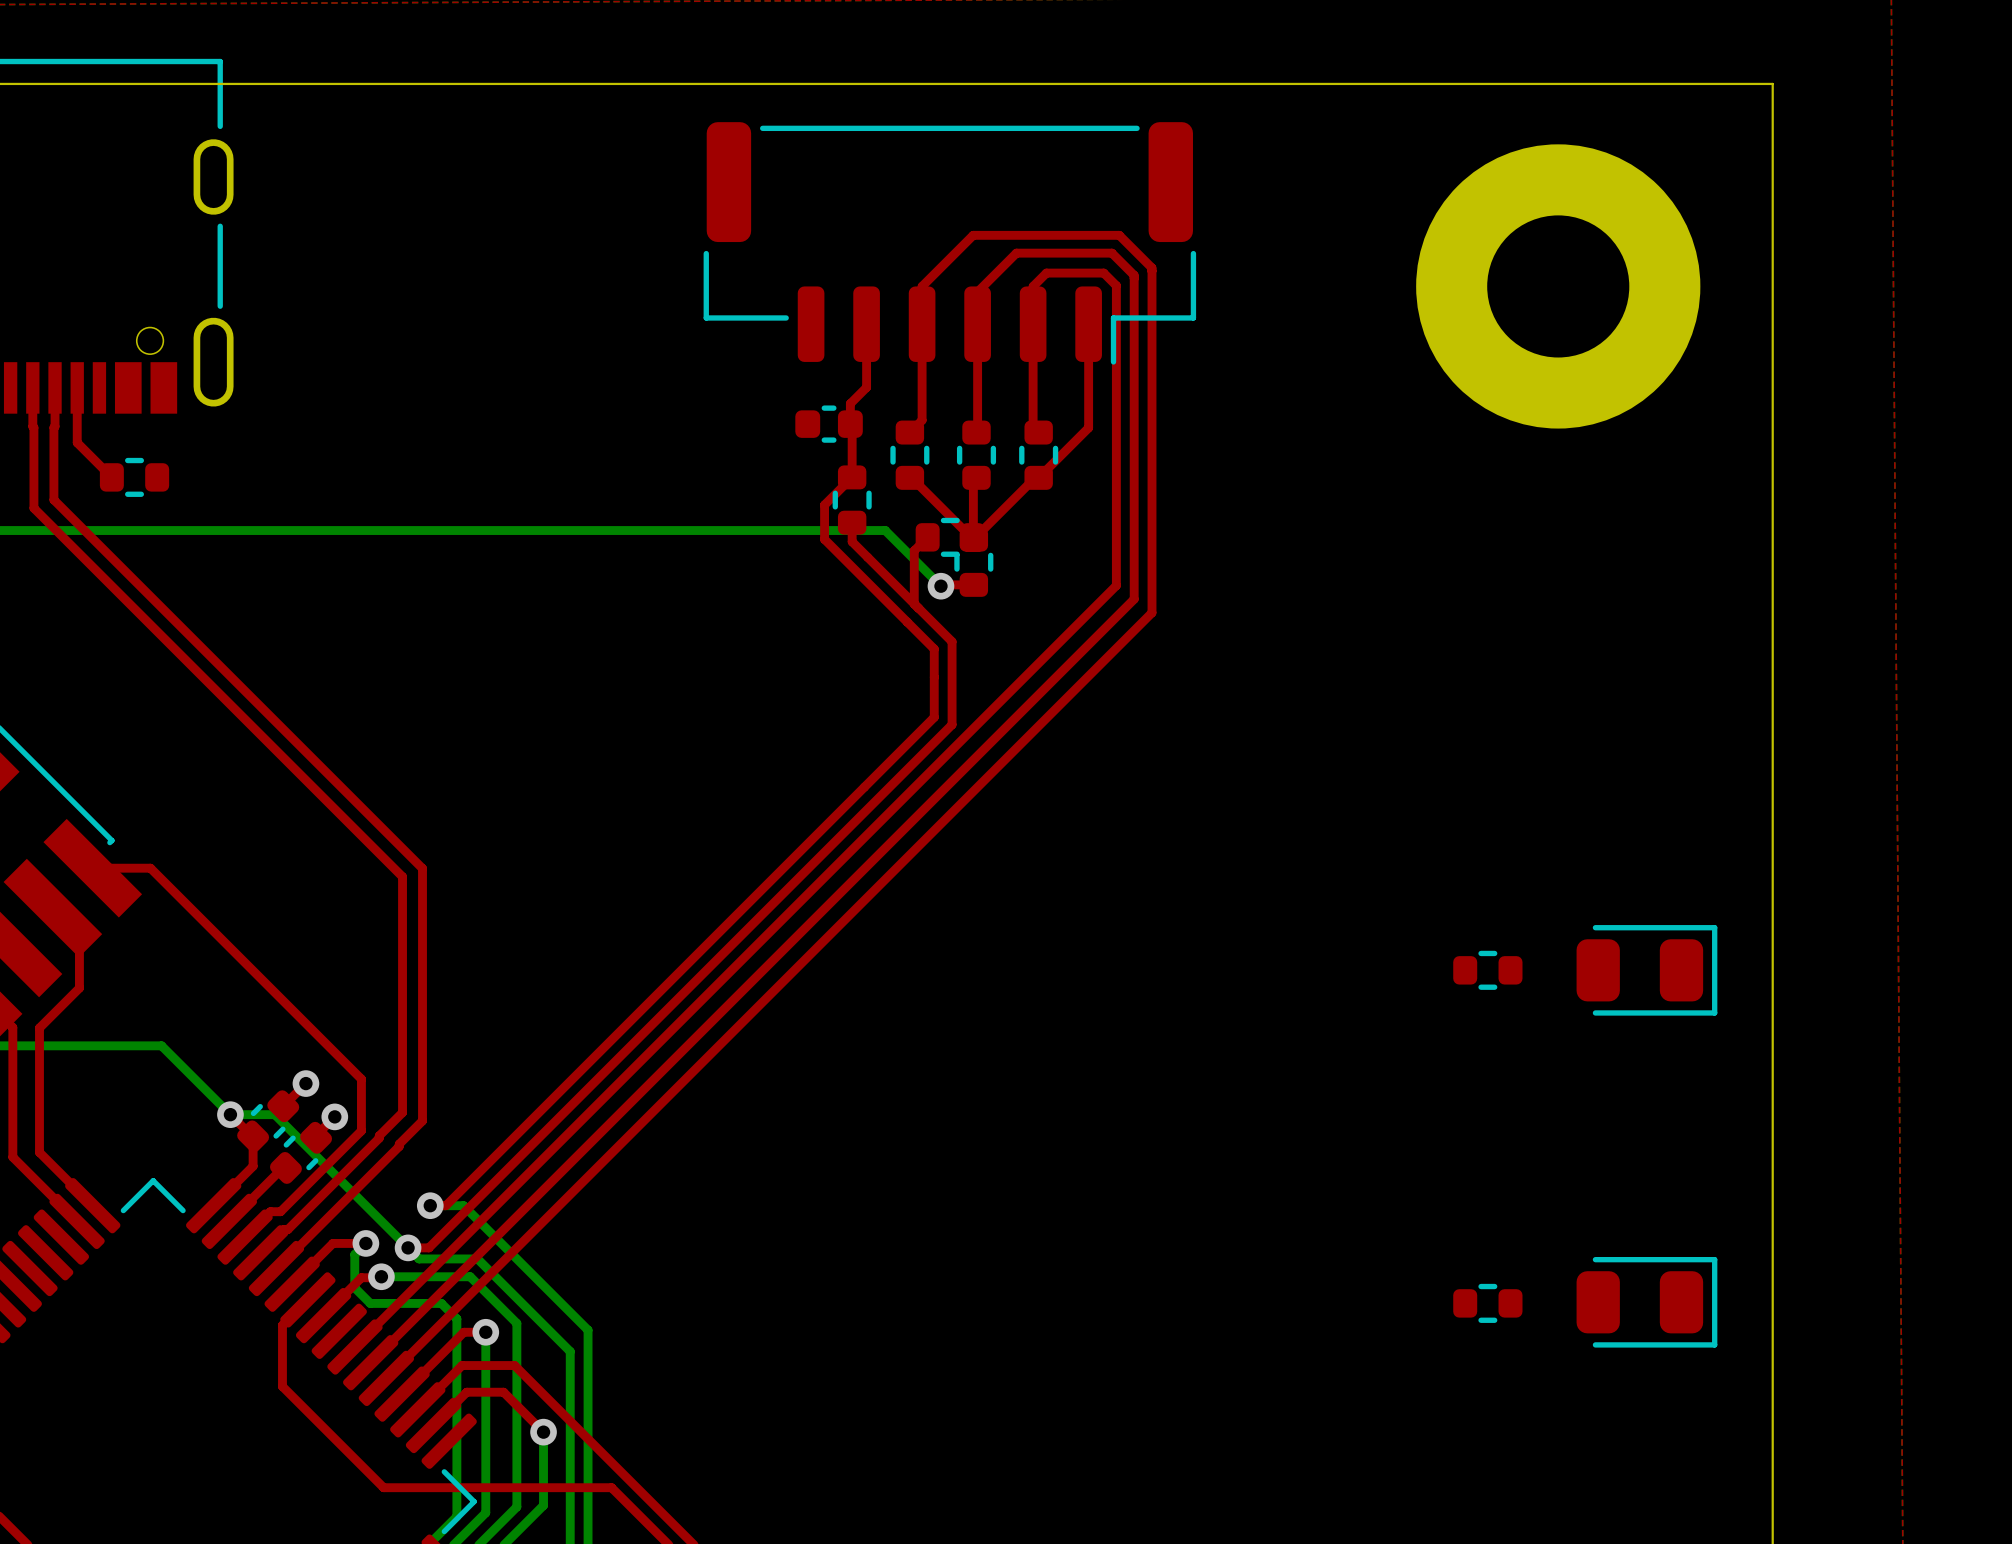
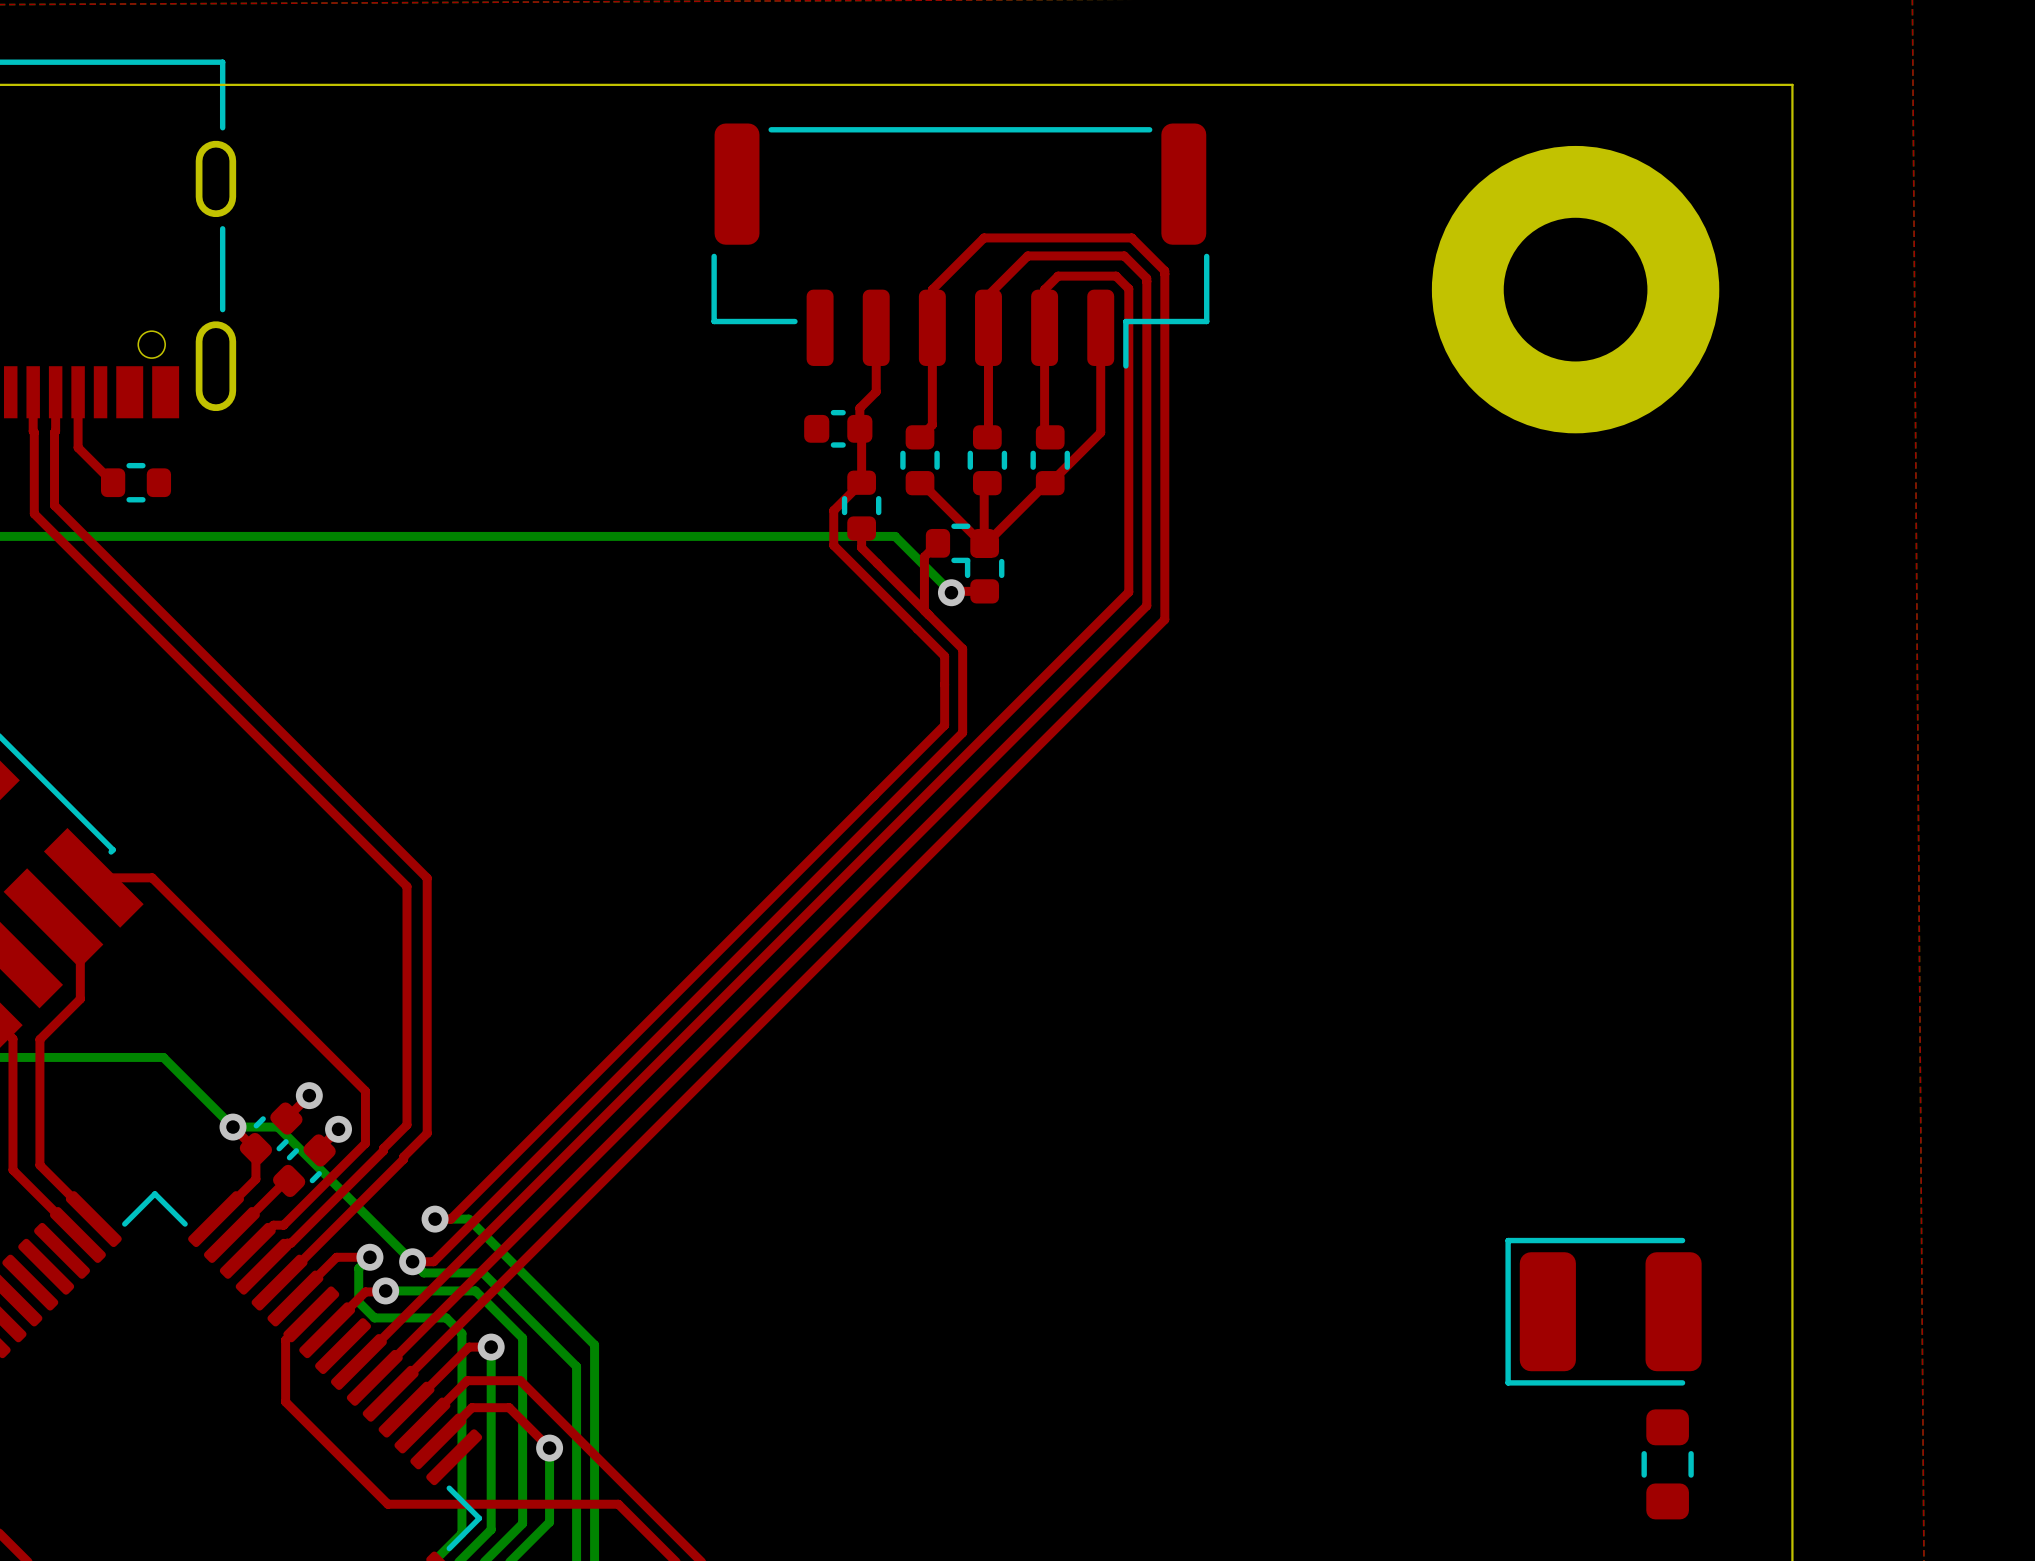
part: (1487, 970) -> none
part: (1646, 970) -> none
part: none -> (1603, 1311)
part: (1646, 1302) -> none
part: (1487, 1303) -> none
part: none -> (1667, 1464)

